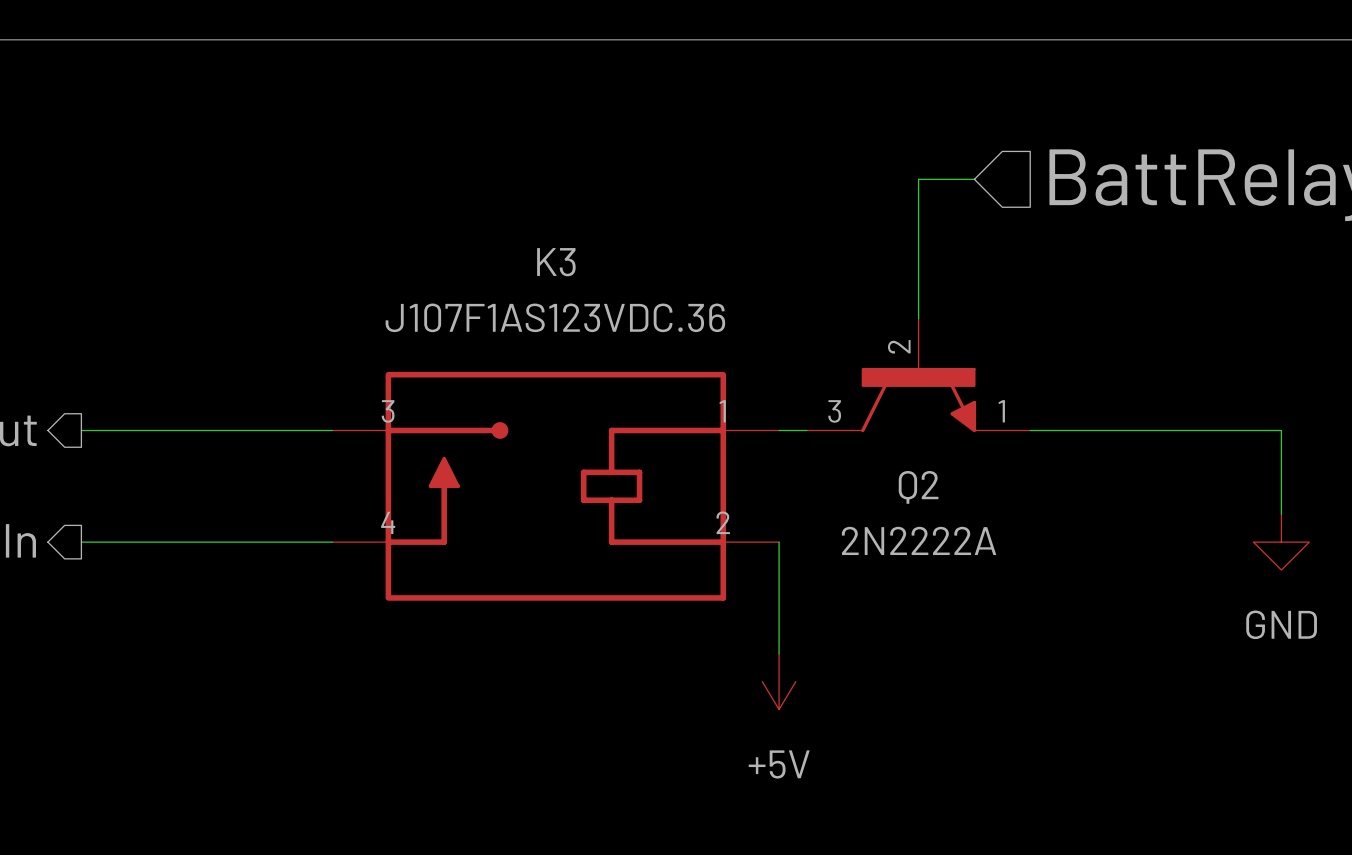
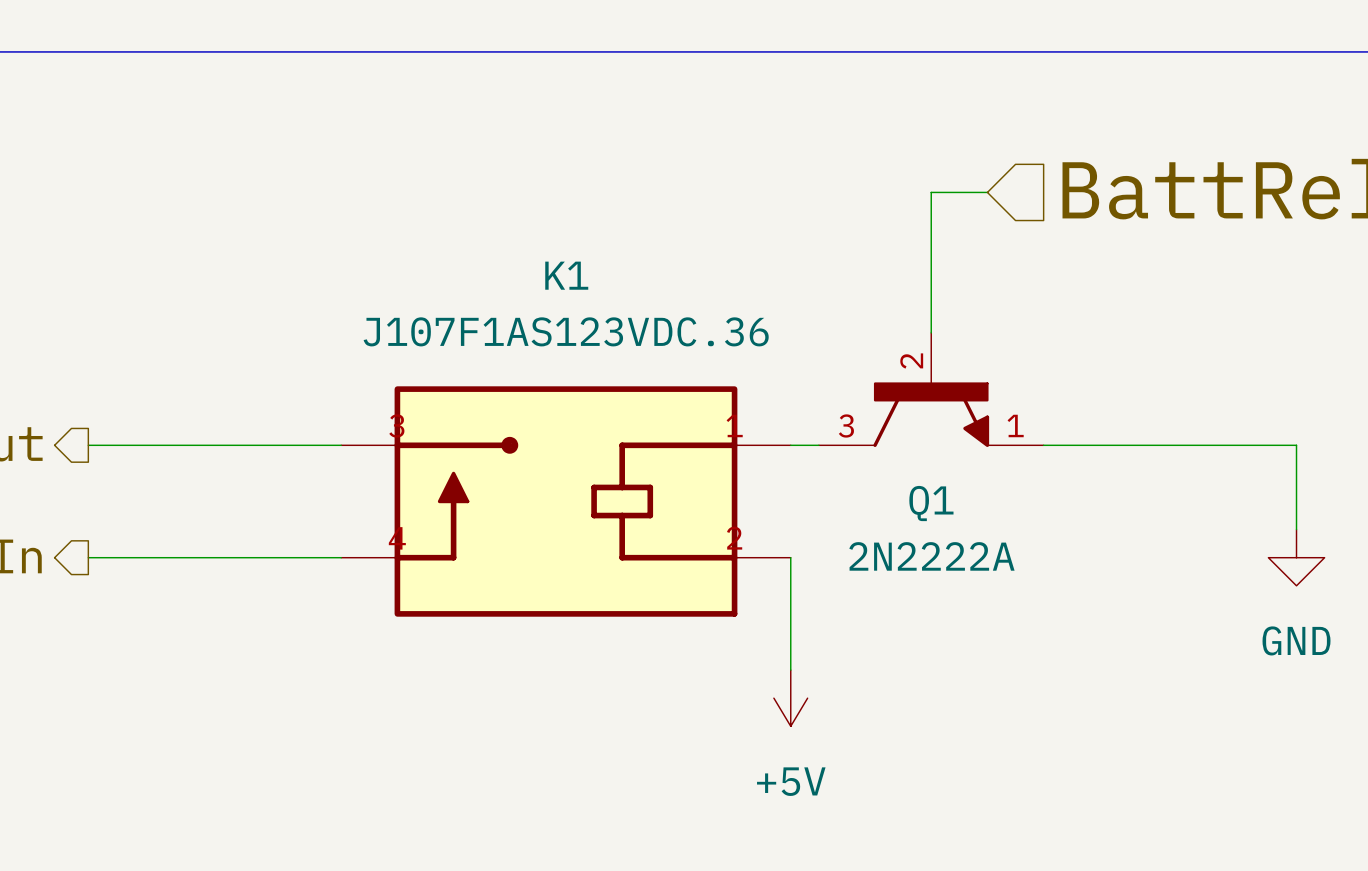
K3 name: K3 (556, 262) -> K1 (566, 275)
Q2 name: Q2 (918, 487) -> Q1 (931, 503)

